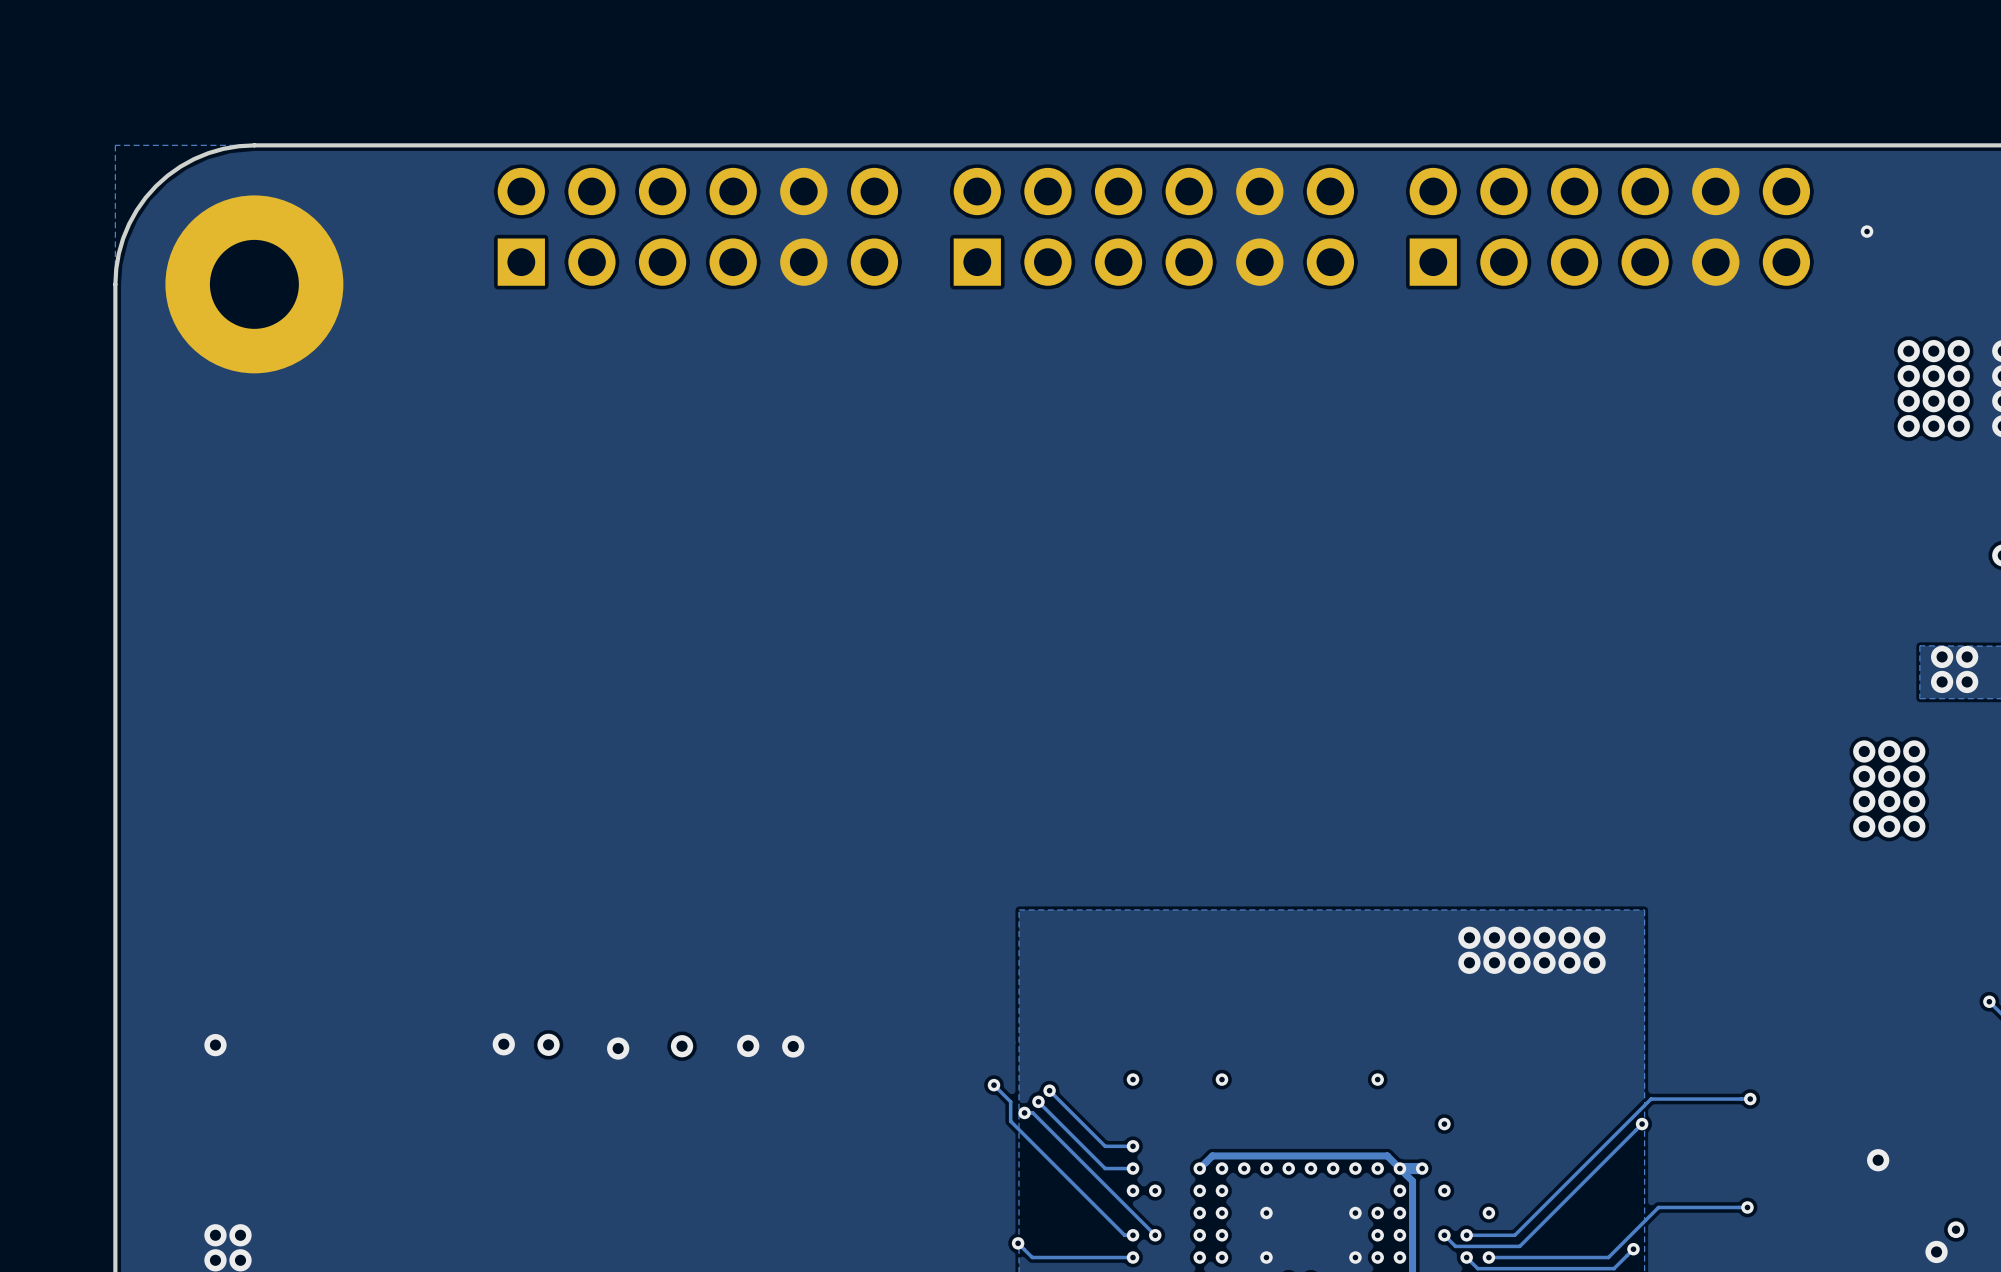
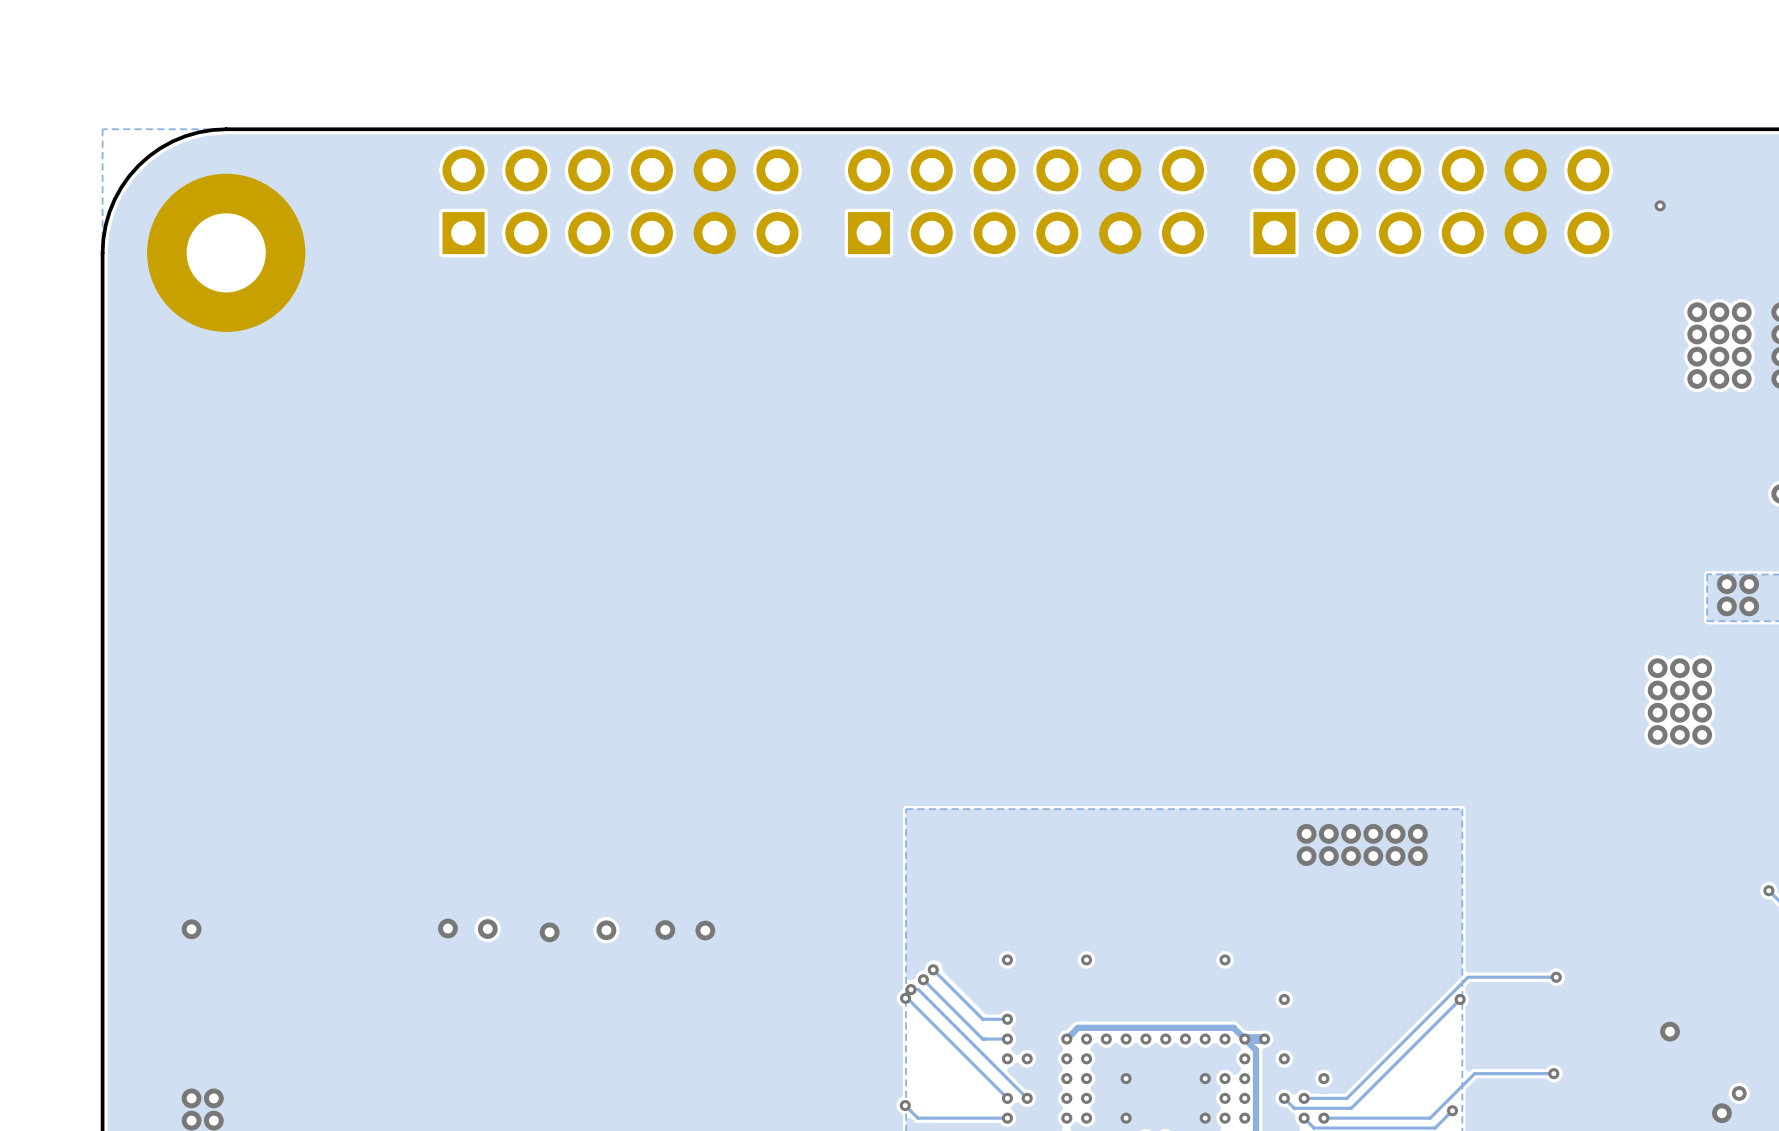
track: (993, 1085) (1010, 1101) (1010, 1121) (1124, 1235) (1133, 1235) -> (905, 998) (1007, 1098)
via position: (993, 1085) -> (905, 998)

